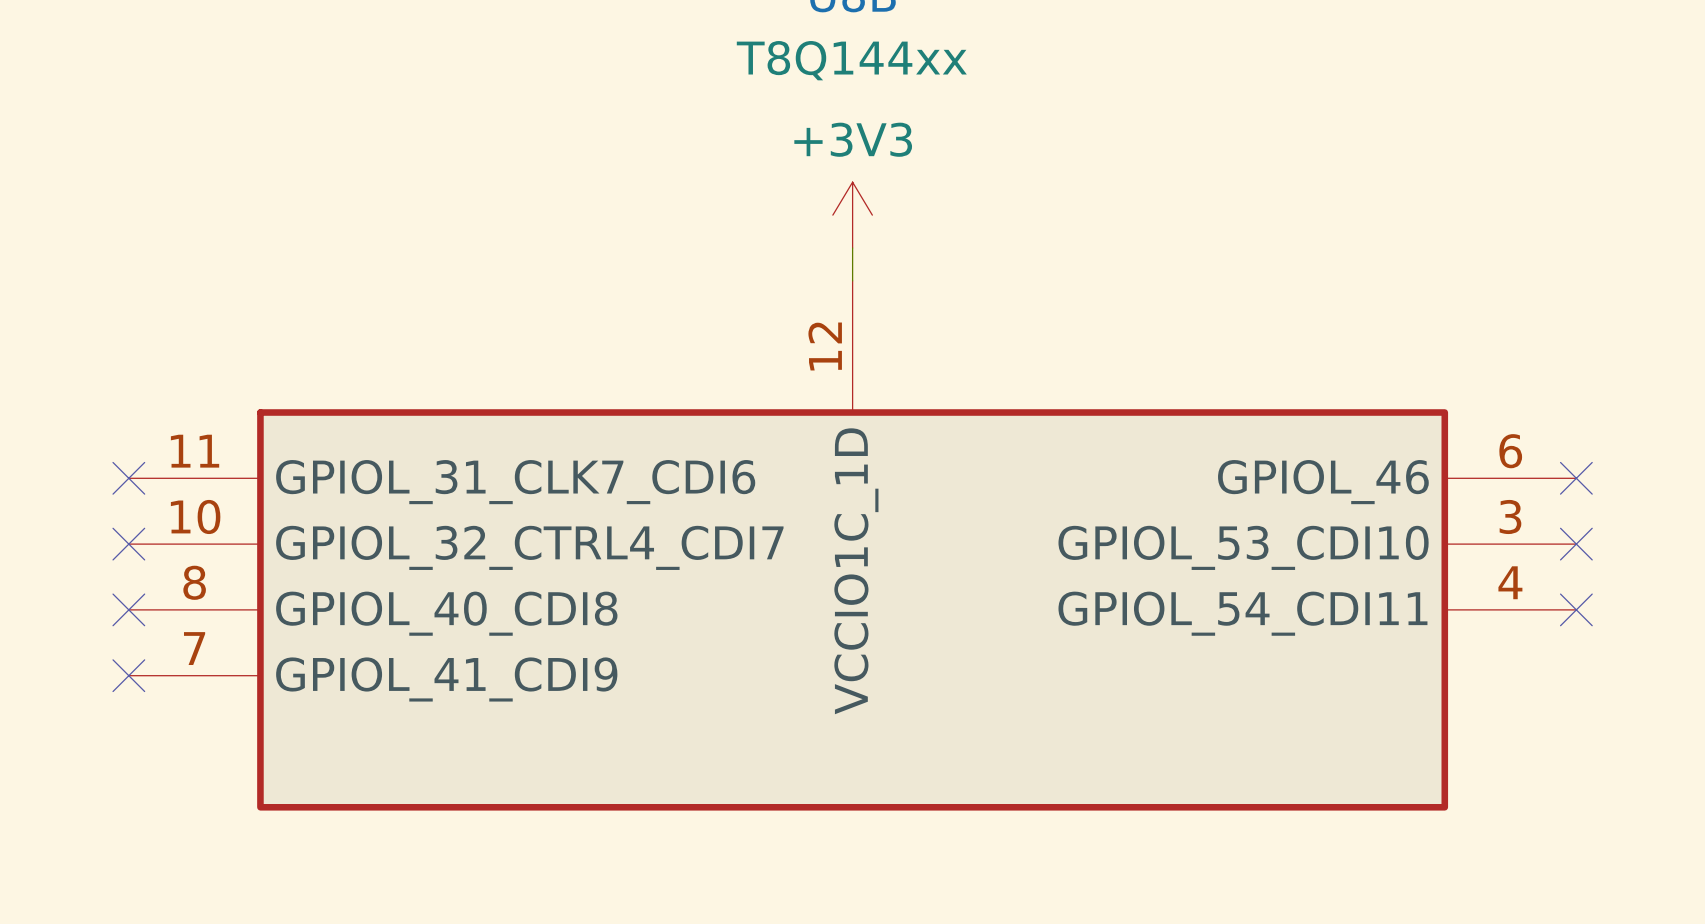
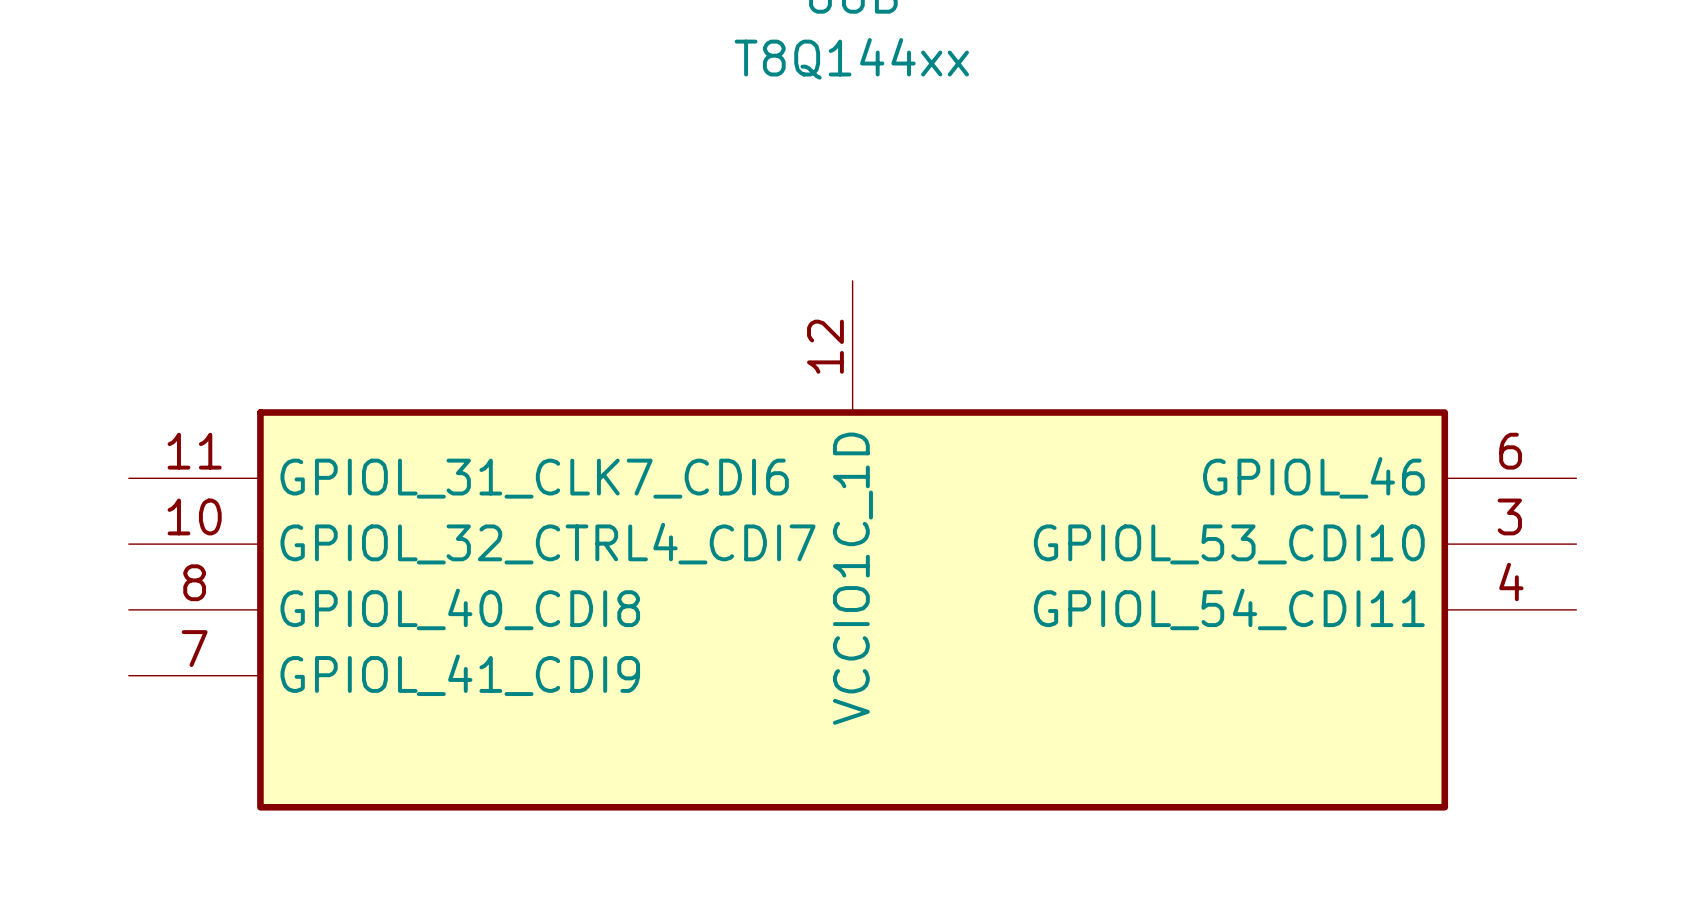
power symbol: +3V3 (852, 215) -> none
wire: (852, 248) (852, 280) -> none
no-connect mark: (128, 478) -> none
no-connect mark: (1576, 478) -> none
no-connect mark: (128, 544) -> none
no-connect mark: (1576, 544) -> none
no-connect mark: (128, 609) -> none
no-connect mark: (1576, 609) -> none
no-connect mark: (128, 675) -> none

